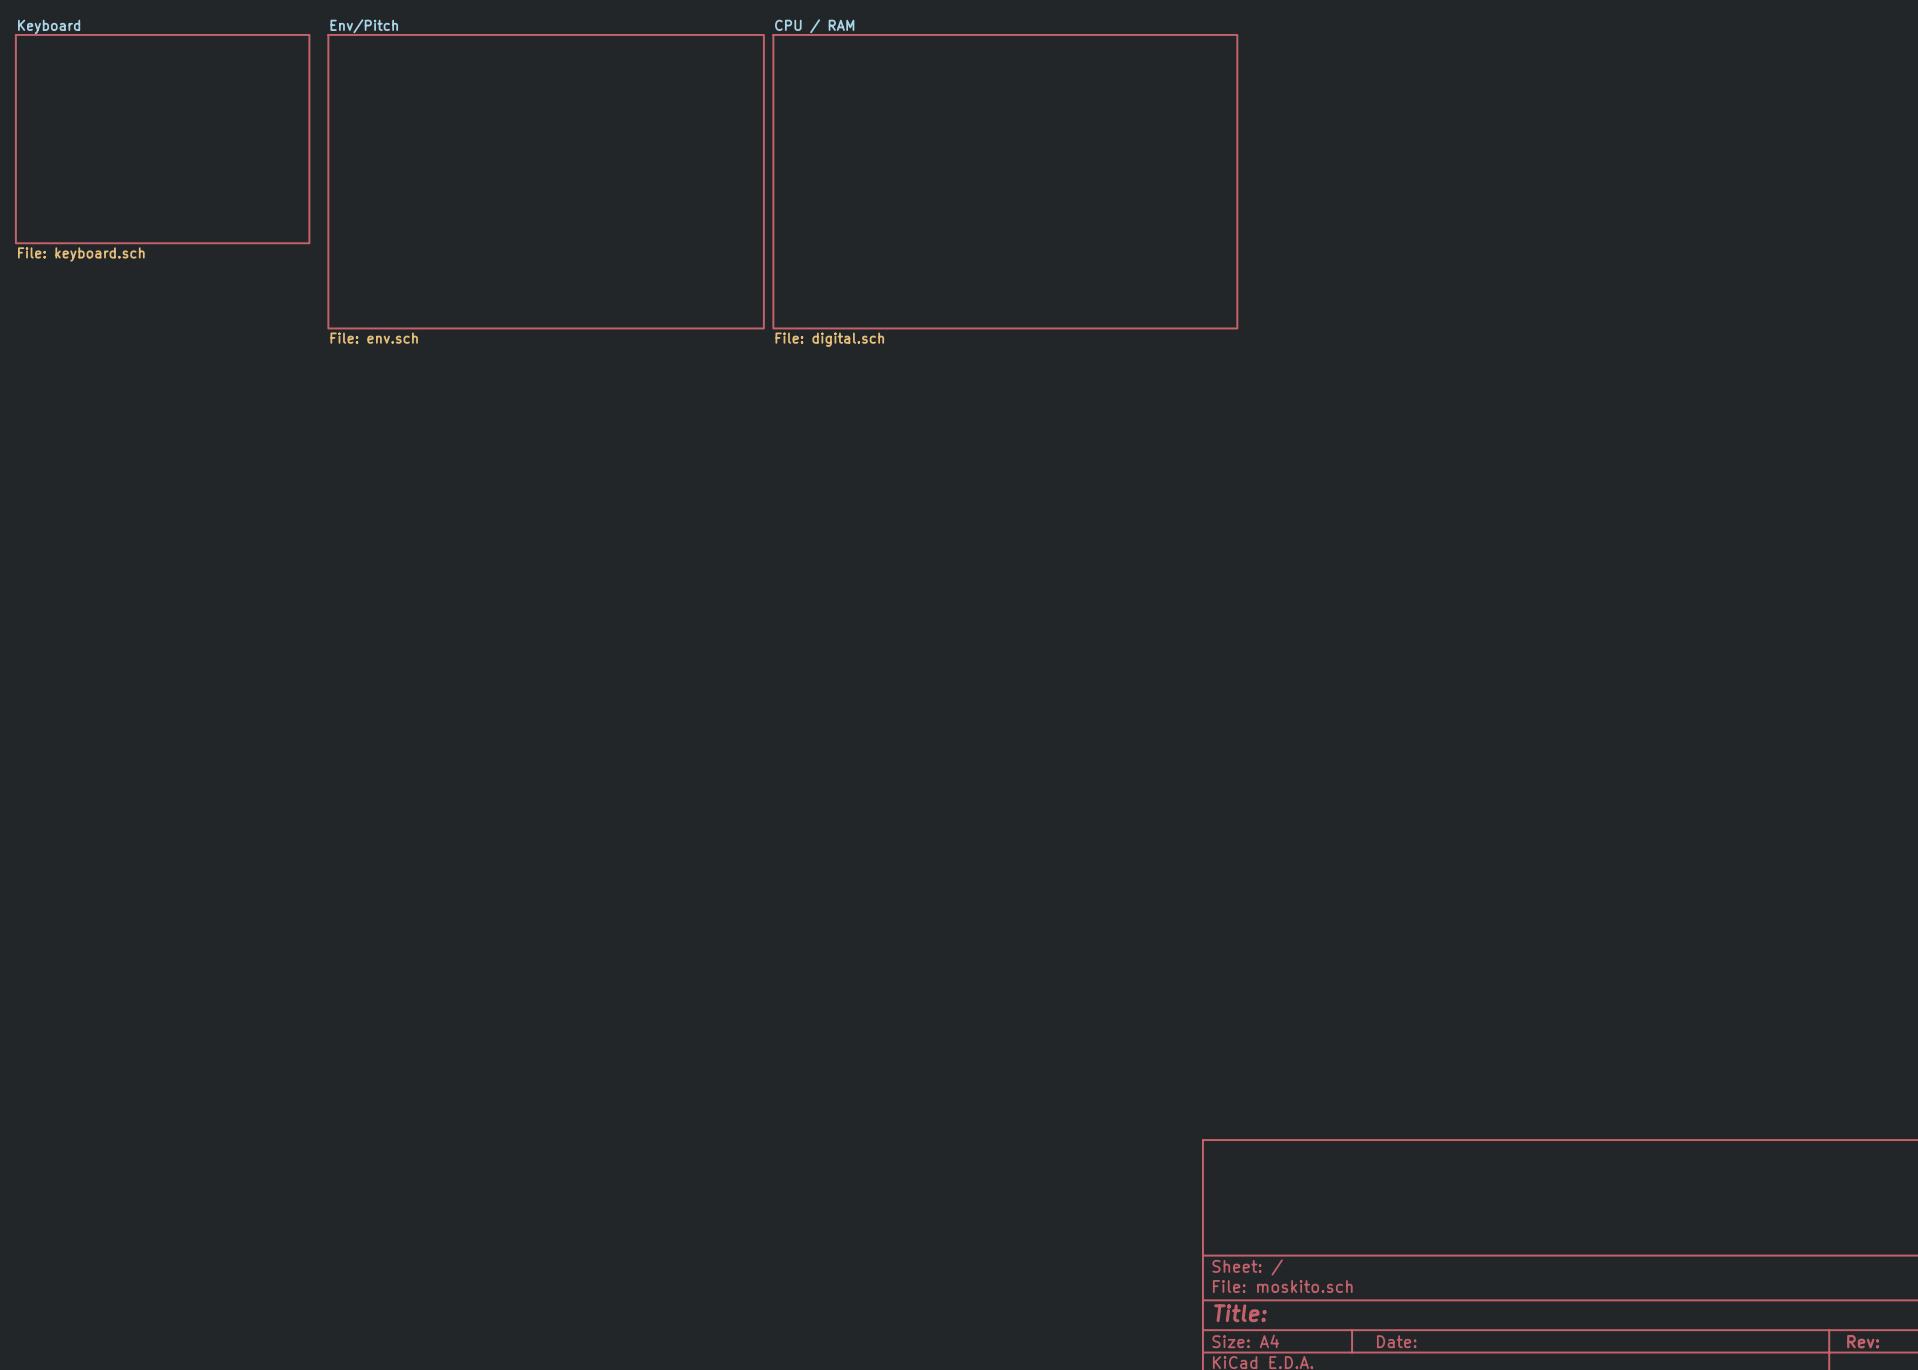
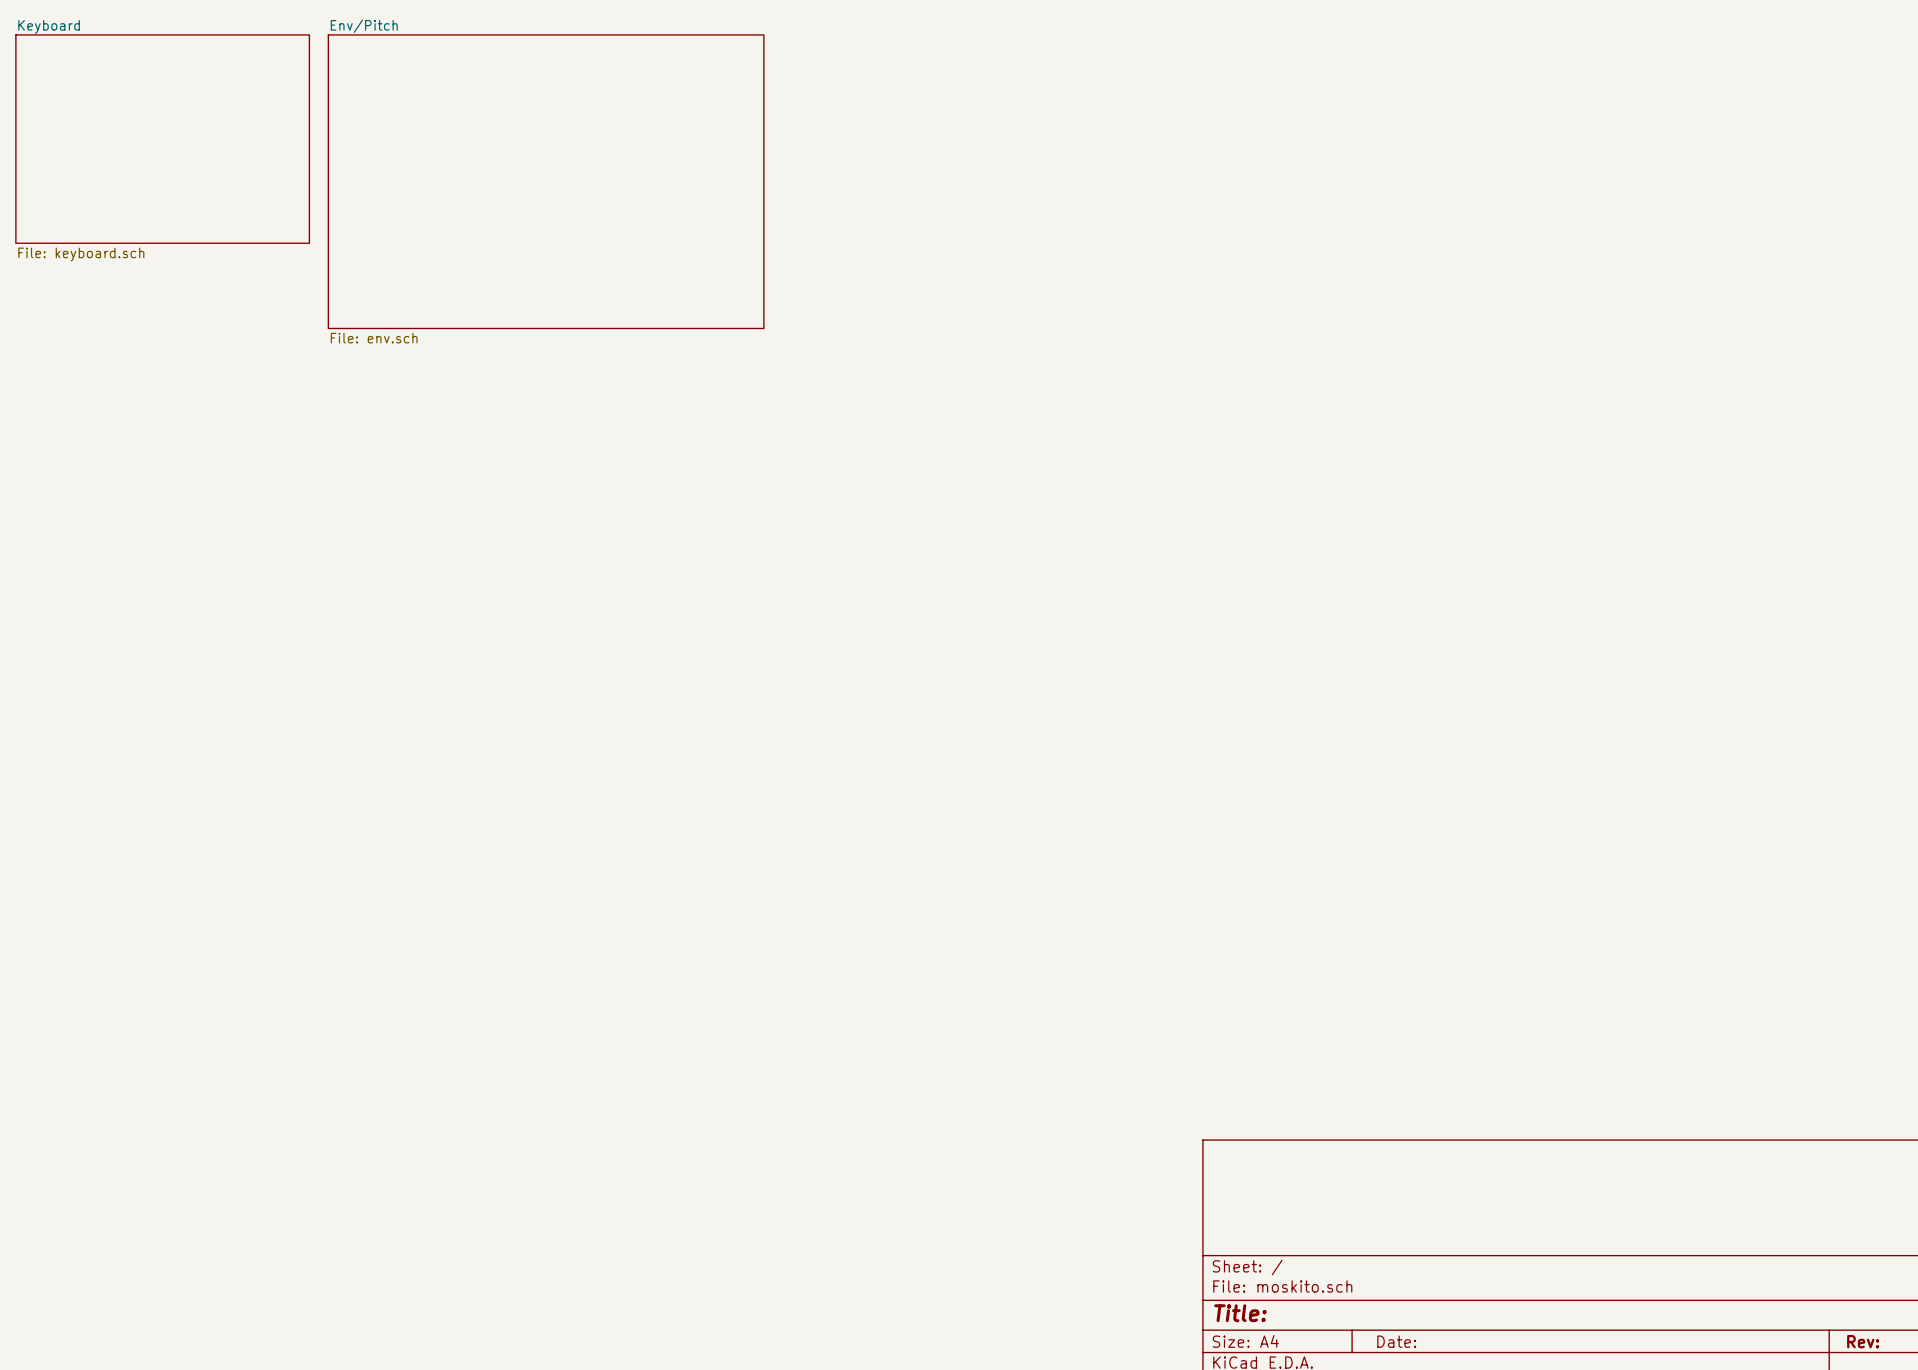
sheet CPU / RAM: File: digital.sch (1005, 181) -> none

